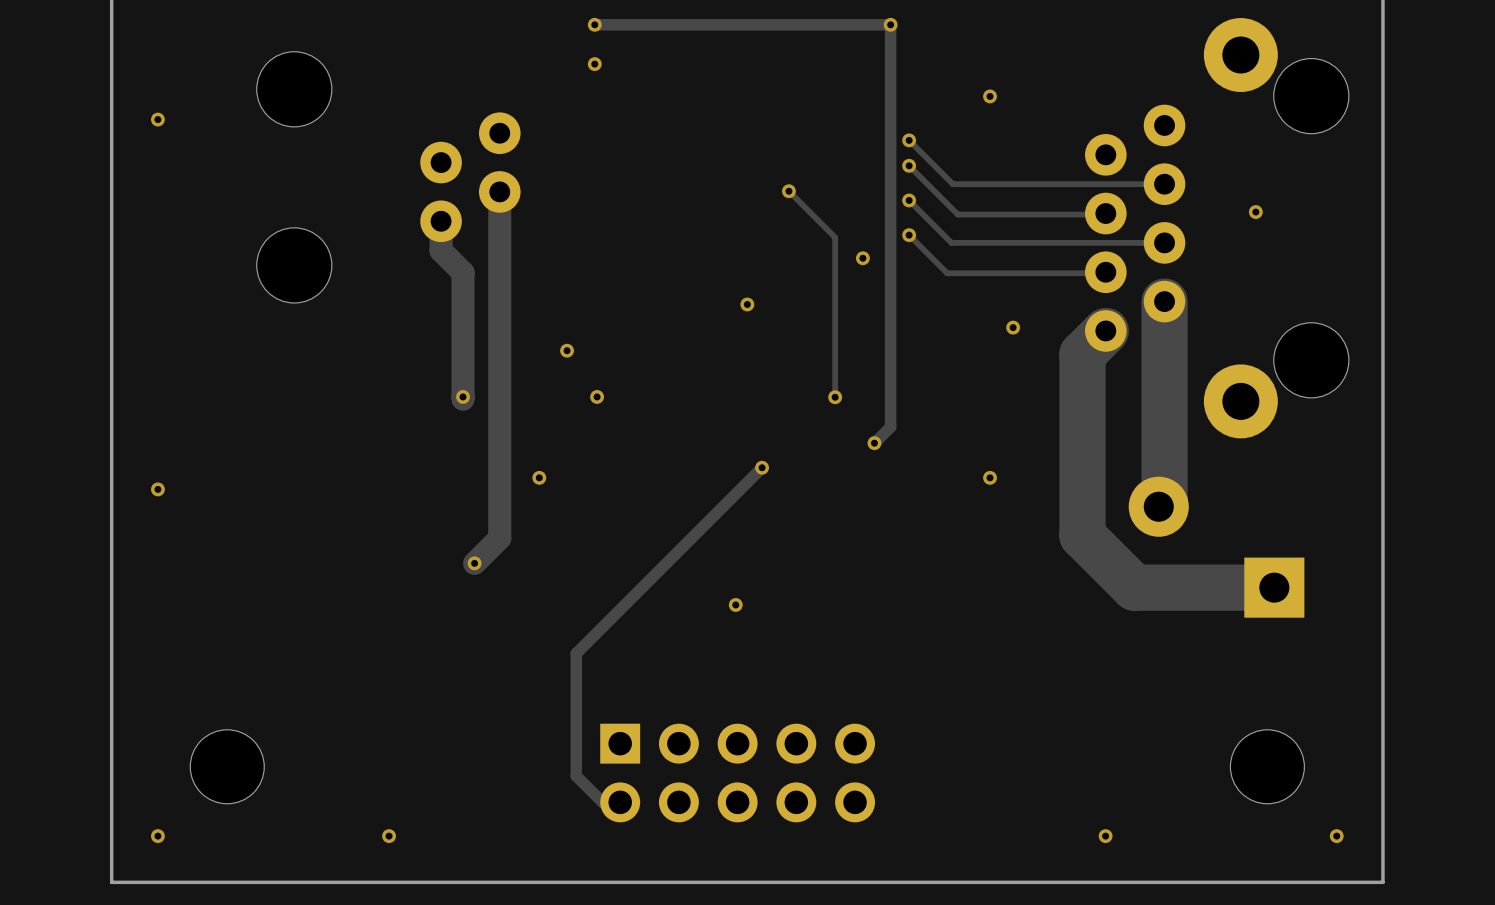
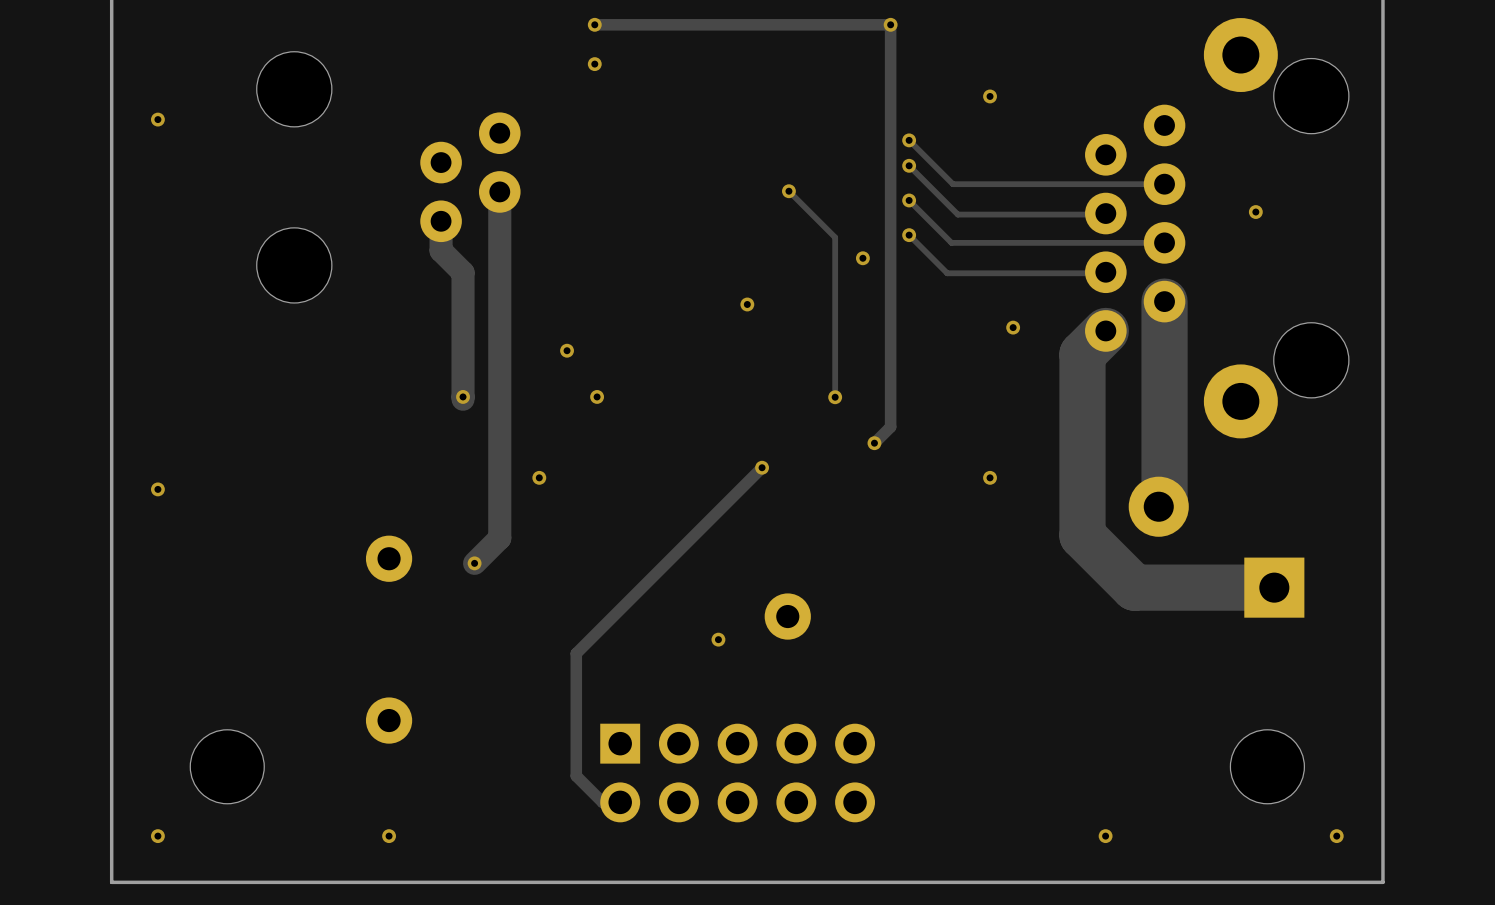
part: none -> (389, 558)
via position: (735, 604) -> (718, 639)
part: none -> (787, 616)
part: none -> (389, 720)

